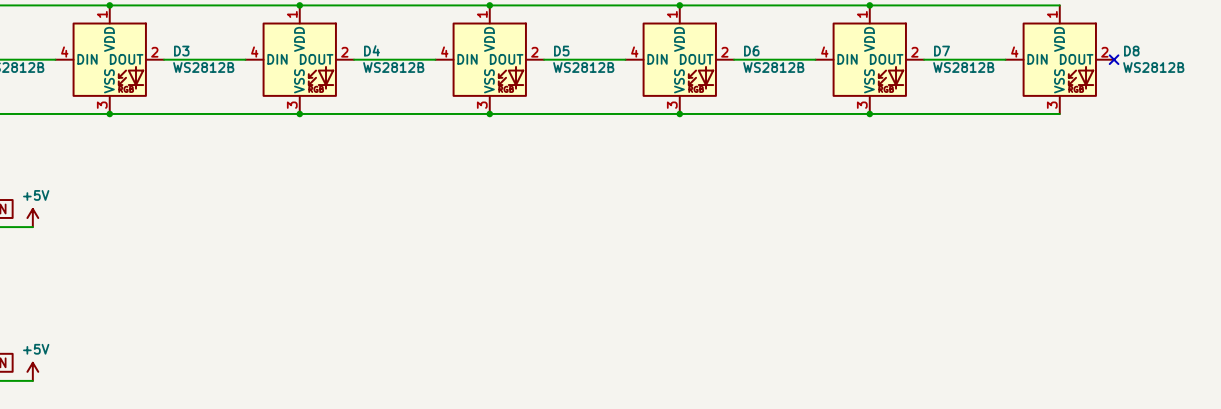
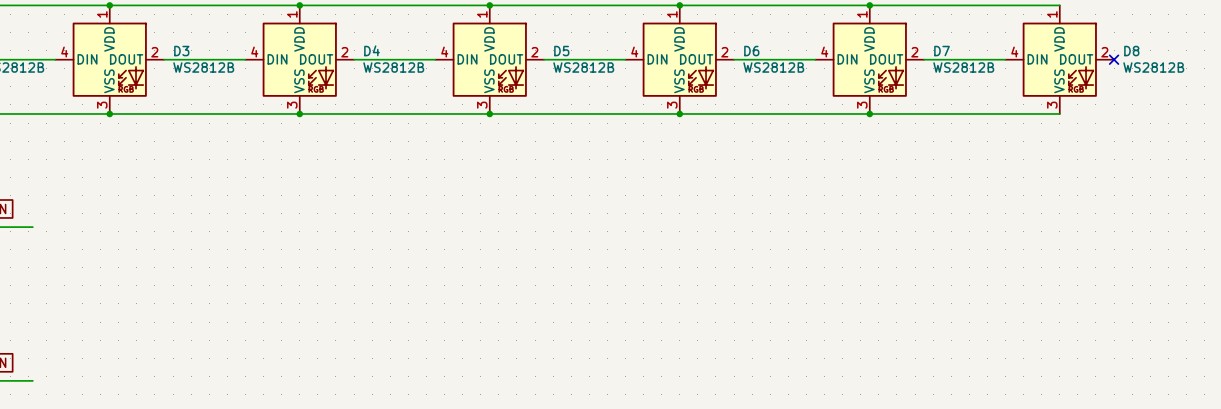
power symbol: +5V (32, 218) -> none
power symbol: +5V (32, 371) -> none

